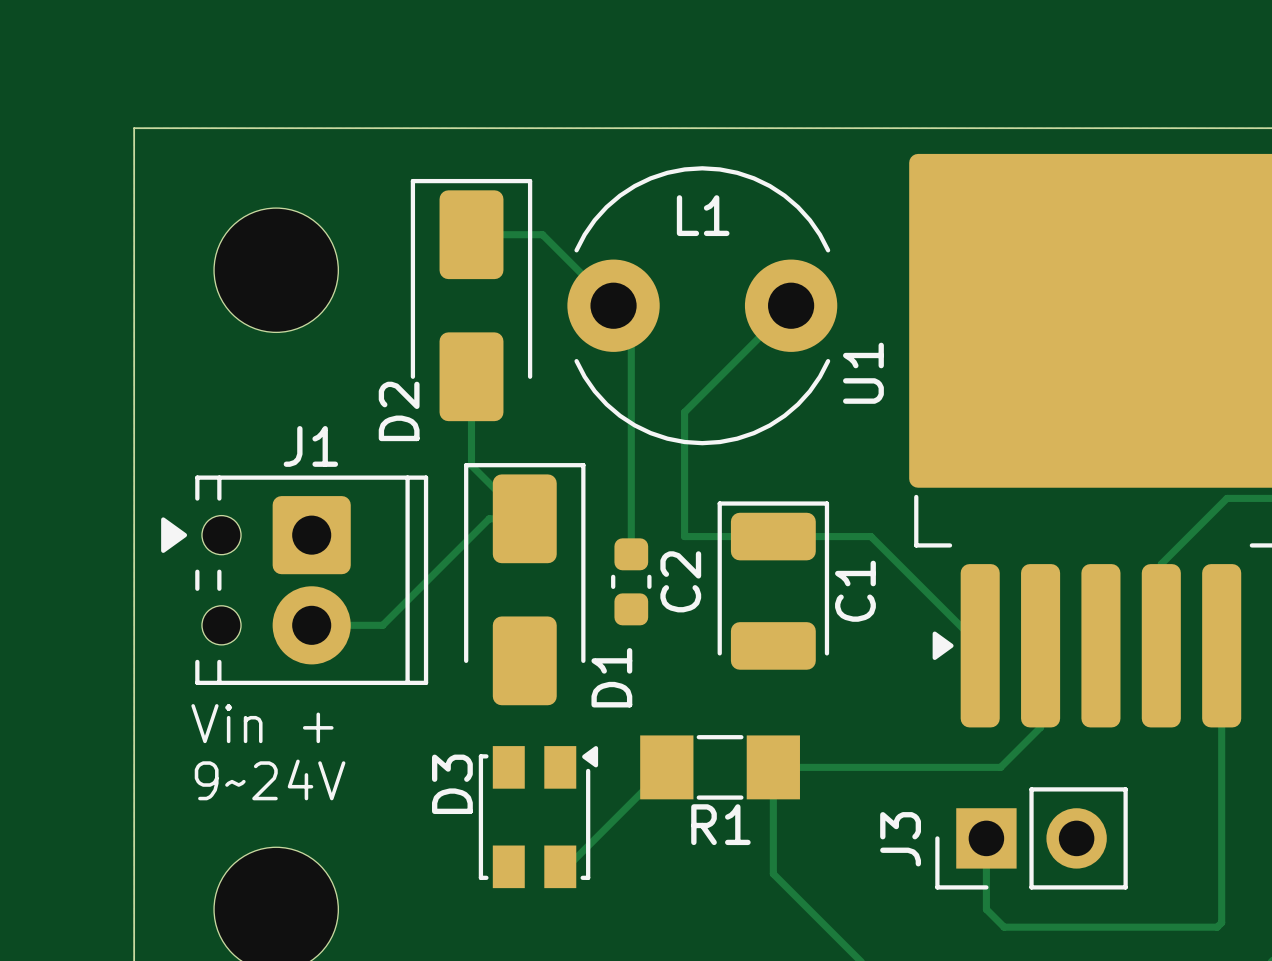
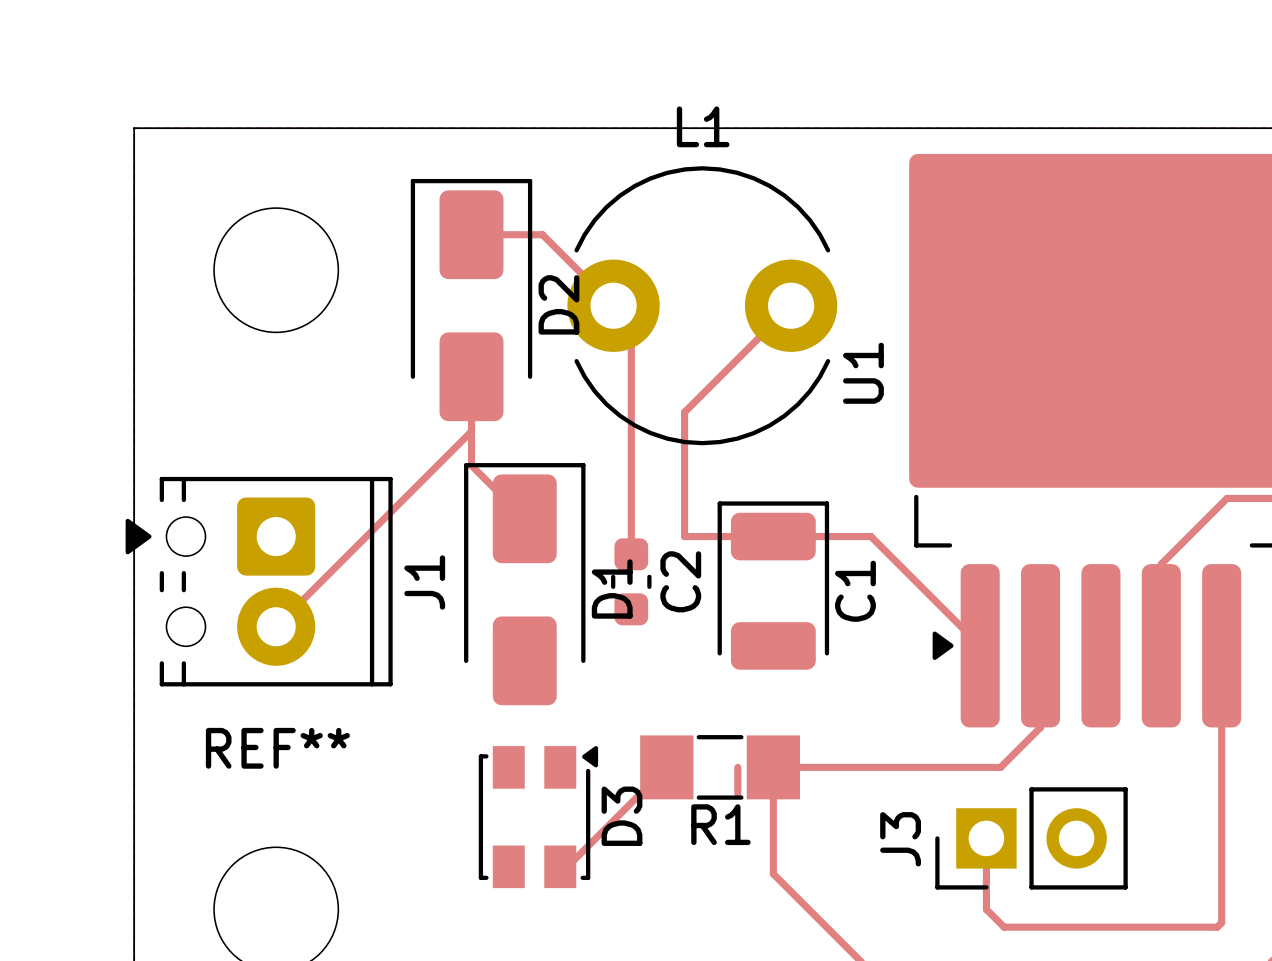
L1 name position: L1 (703, 215) -> L1 (703, 126)
D2 name position: D2 (399, 411) -> D2 (558, 304)
track: none -> (471, 431) (276, 626)
J1 name rotation: 0° (310, 446) -> 90° counterclockwise (424, 582)
J1 name position: J1 (310, 446) -> J1 (424, 582)
track: (524, 518) (489, 518) (382, 625) (311, 625) -> none
J1 position: (294, 580) -> (259, 581)
D1 name position: D1 (611, 677) -> D1 (612, 588)
text: Vin + (262, 723) -> none
REF** name: none -> REF** (277, 748)
track: none -> (737, 767) (737, 794)
text: 9~24V (270, 779) -> none
D3 name position: D3 (452, 784) -> D3 (621, 816)

